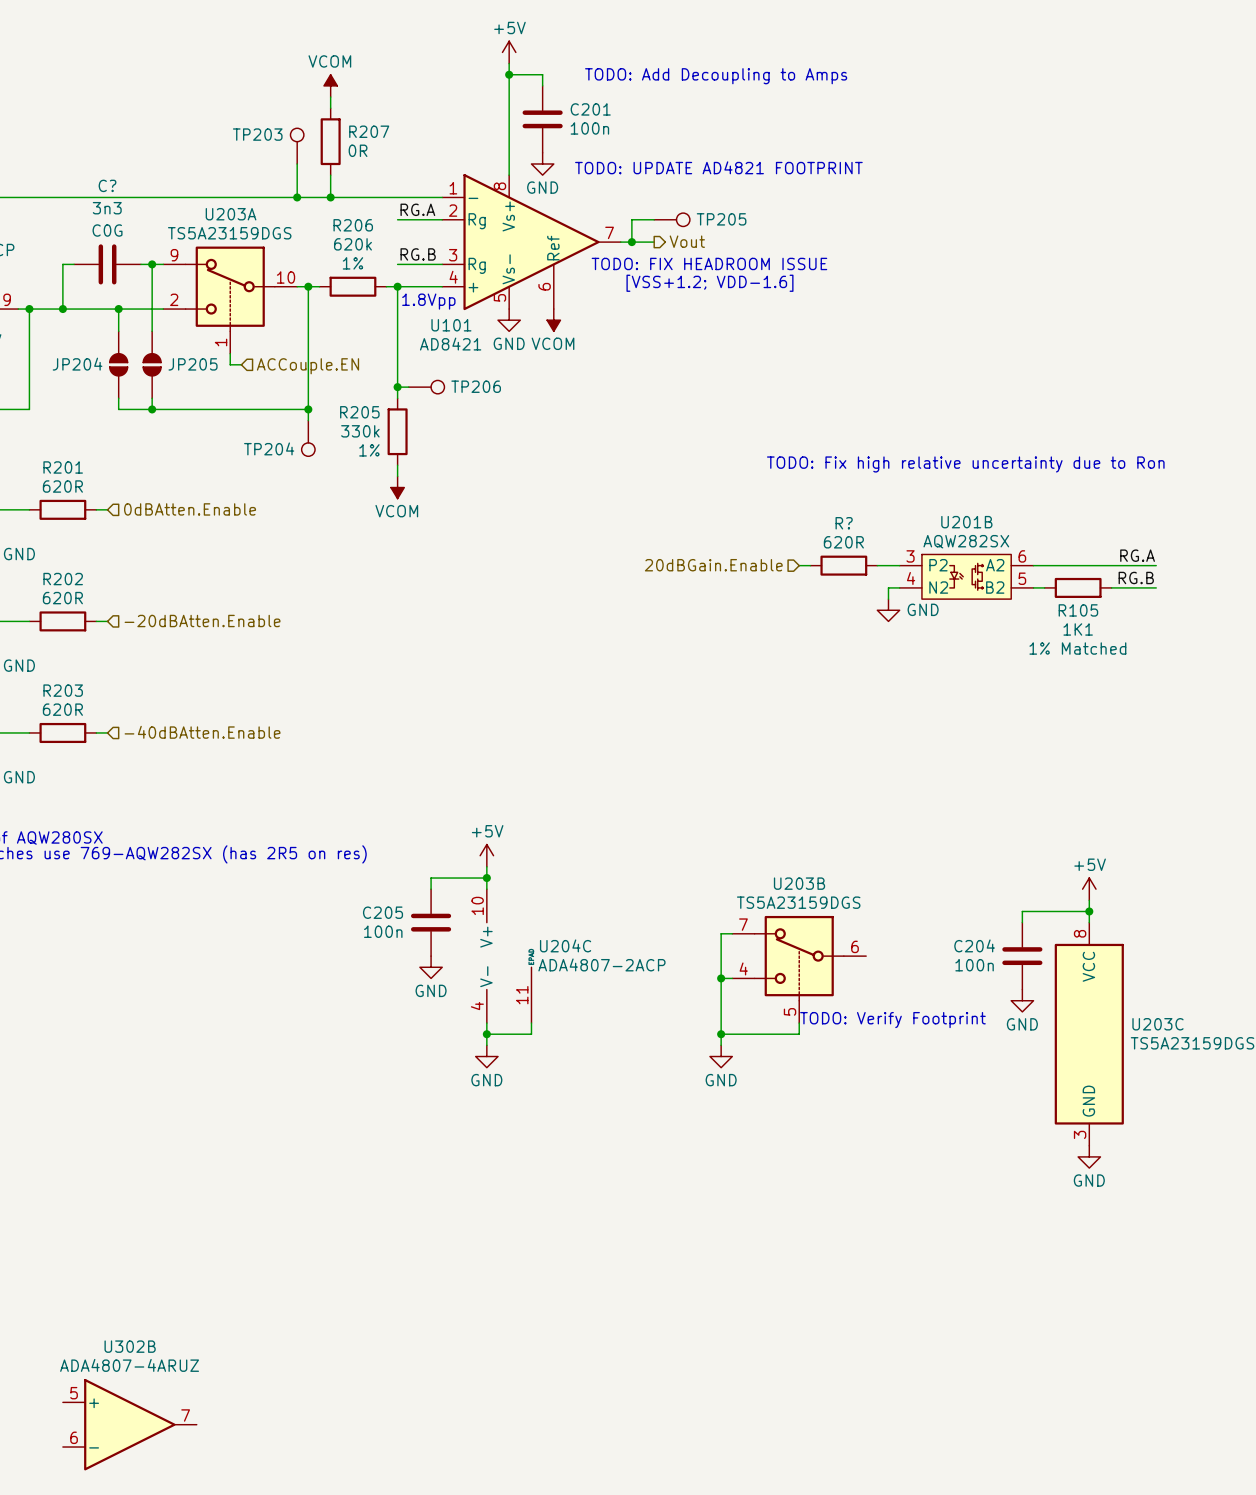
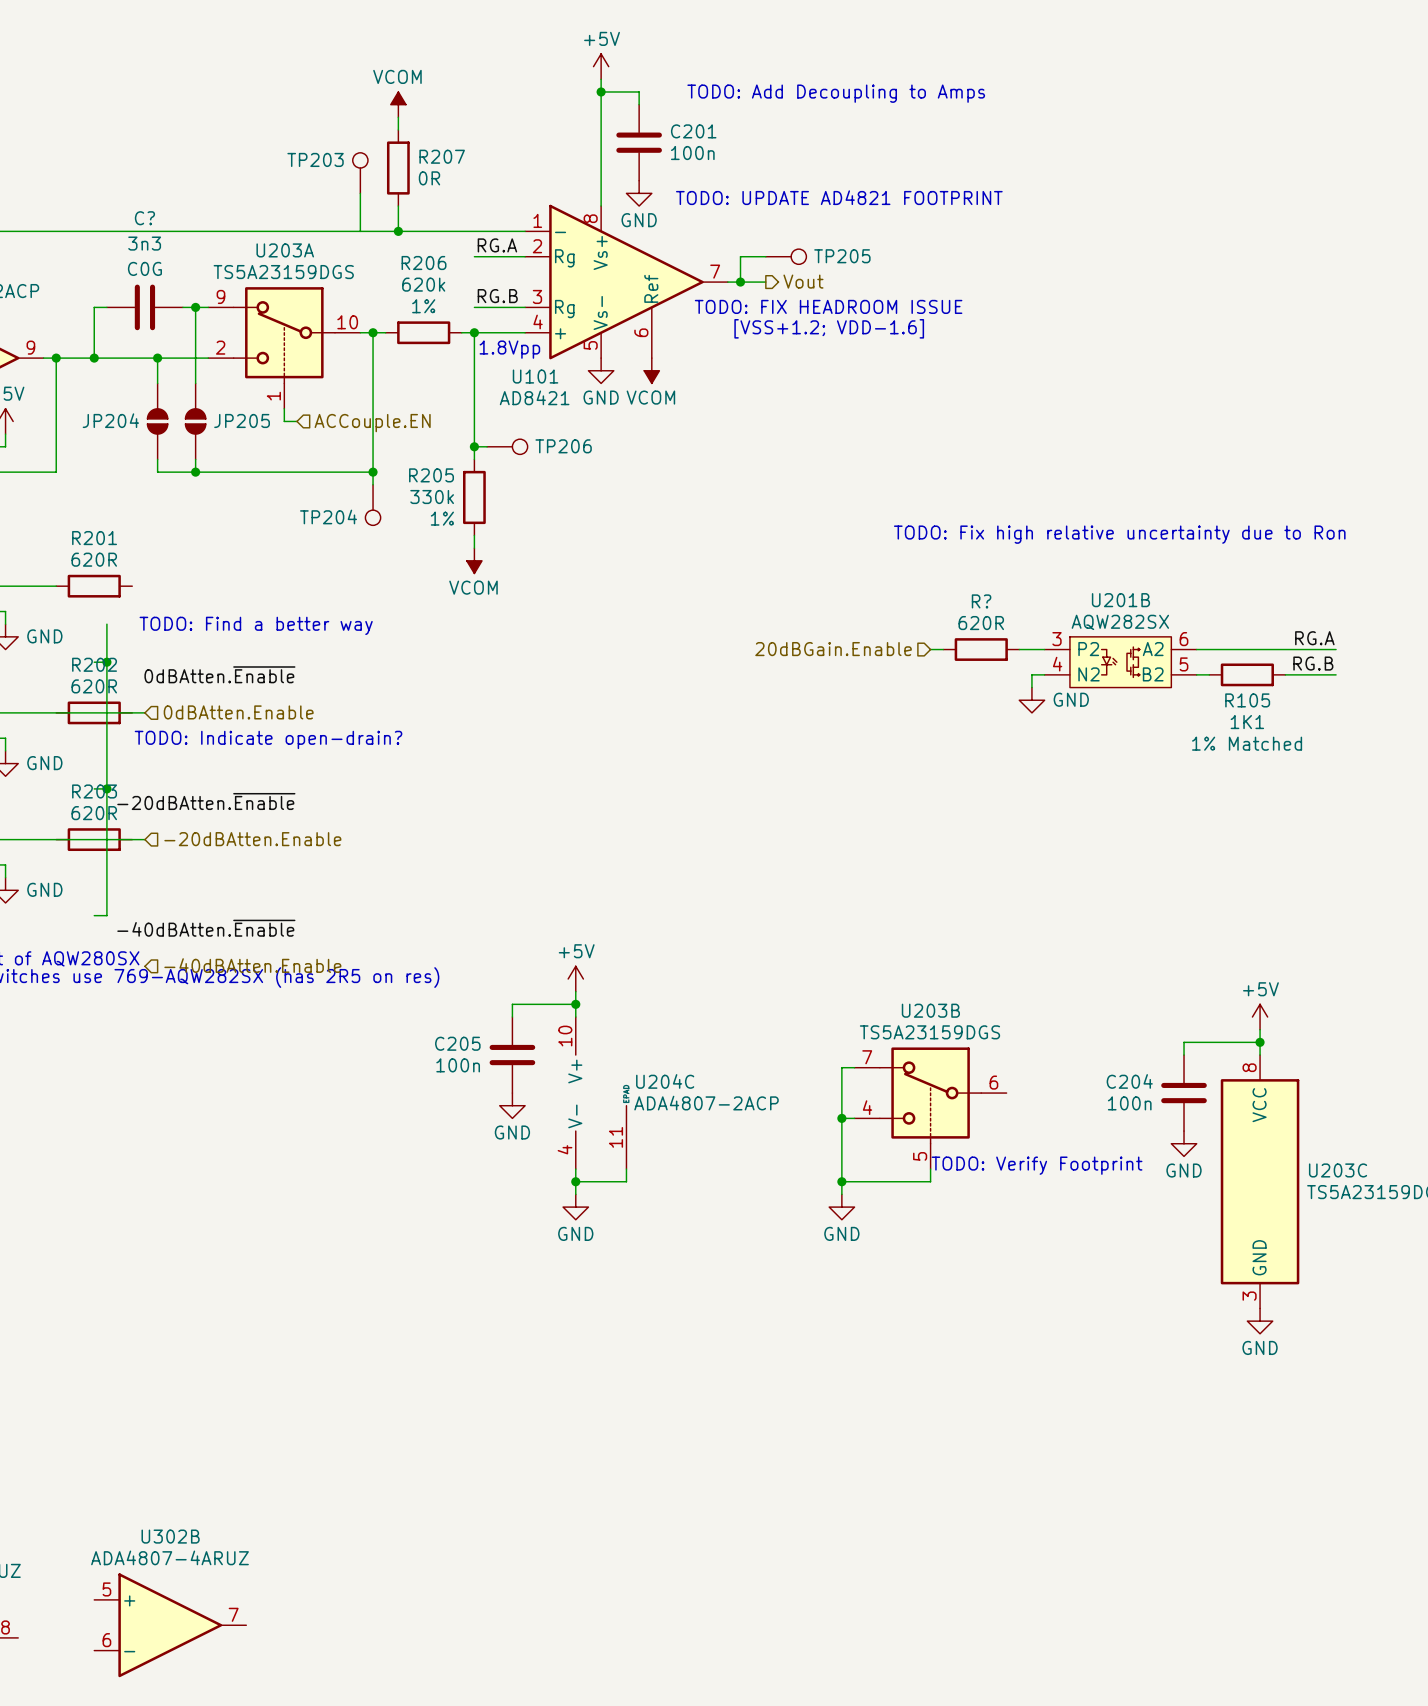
junction: (297, 197) -> none
wire: (96, 509) (107, 509) -> (94, 662) (106, 662)
hierarchical label: 0dBAtten.Enable (190, 509) -> none
wire: none -> (106, 624) (106, 915) (94, 915)
text: none -> TODO: Find a better way (256, 625)
junction: none -> (106, 662)
label: none -> 0dBAtten.~{Enable} (219, 674)
wire: none -> (56, 712) (132, 712)
hierarchical label: -20dBAtten.Enable (202, 621) -> 0dBAtten.Enable (238, 712)
text: none -> TODO: Indicate open-drain? (268, 739)
wire: none -> (94, 788) (106, 788)
junction: none -> (106, 788)
label: none -> -20dBAtten.~{Enable} (206, 801)
wire: none -> (56, 839) (132, 839)
hierarchical label: -40dBAtten.Enable (202, 732) -> -20dBAtten.Enable (252, 839)
label: none -> -40dBAtten.~{Enable} (206, 928)
hierarchical label: none -> -40dBAtten.Enable (252, 965)

